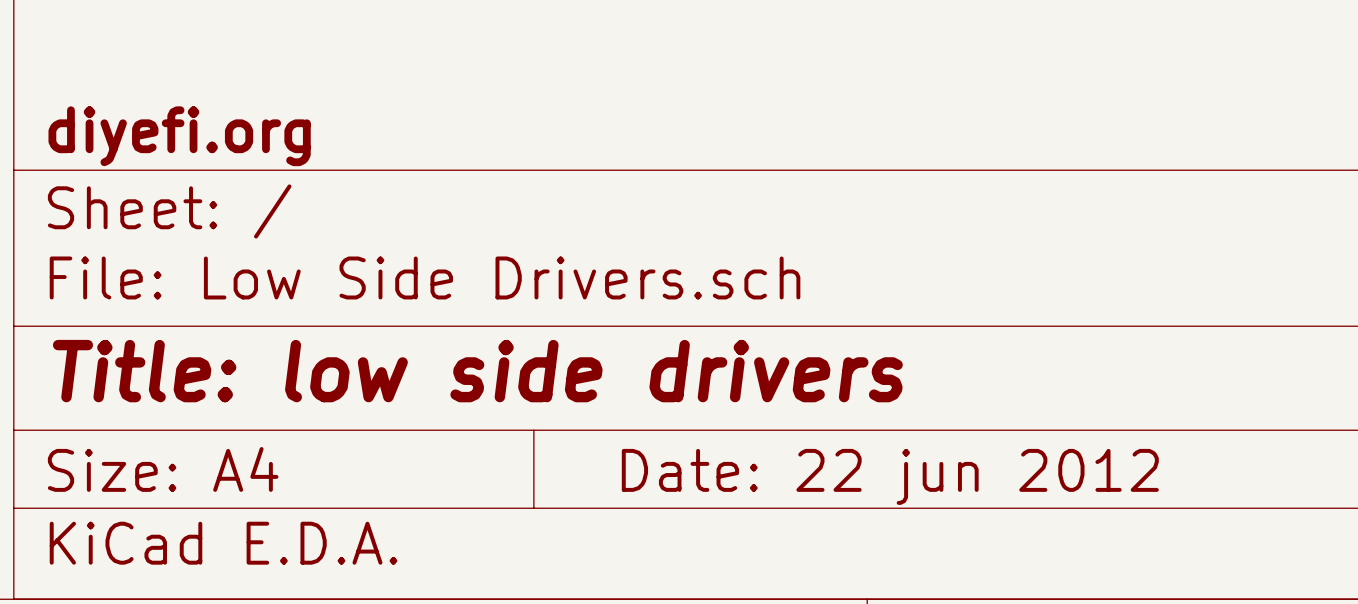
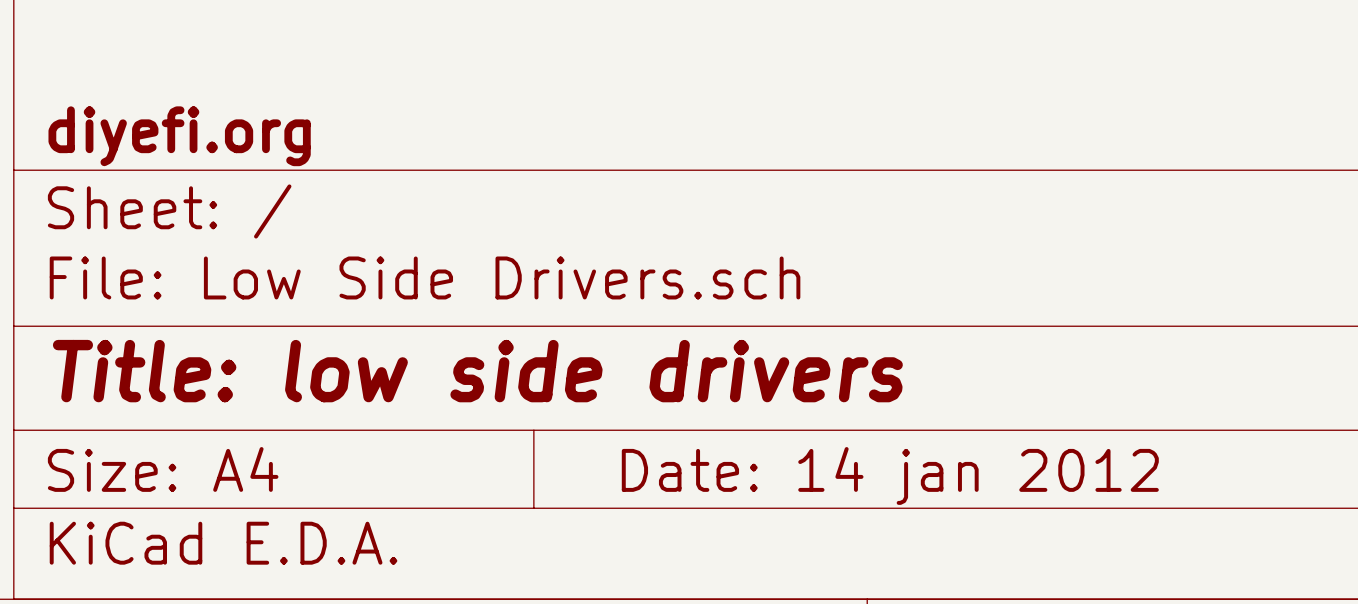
title block: Date: 22 jun 2012 (890, 476) -> Date: 14 jan 2012 (890, 475)

